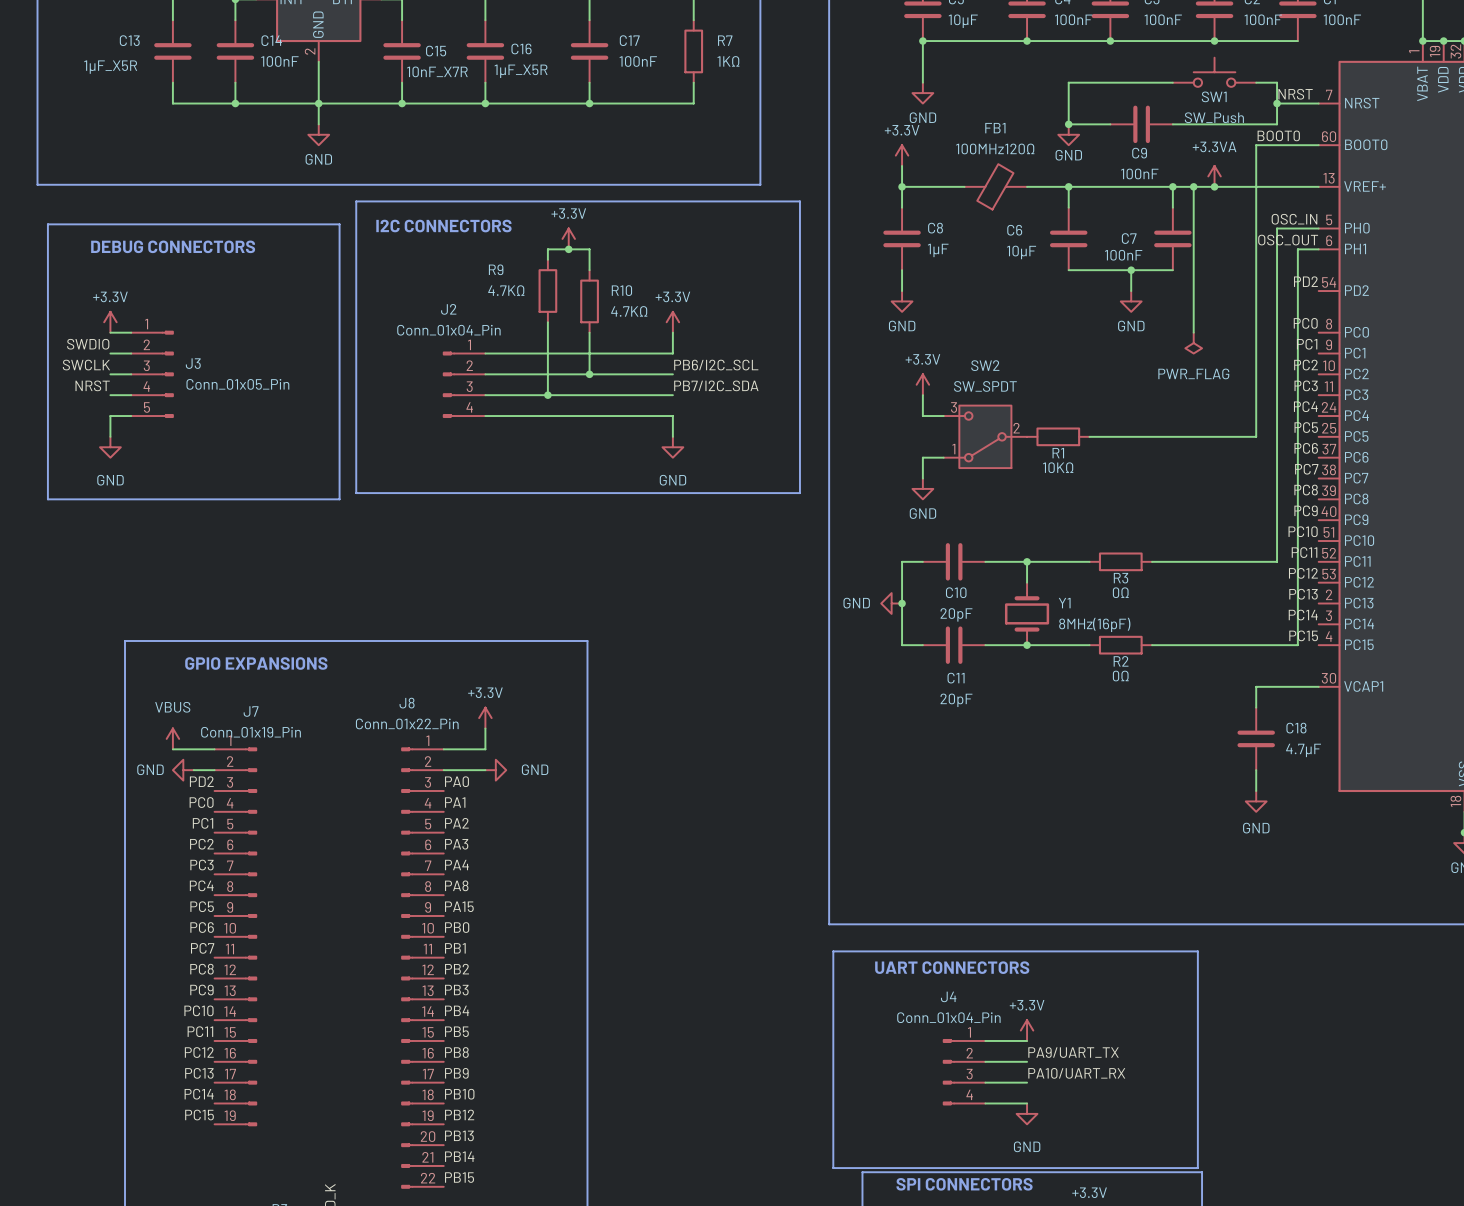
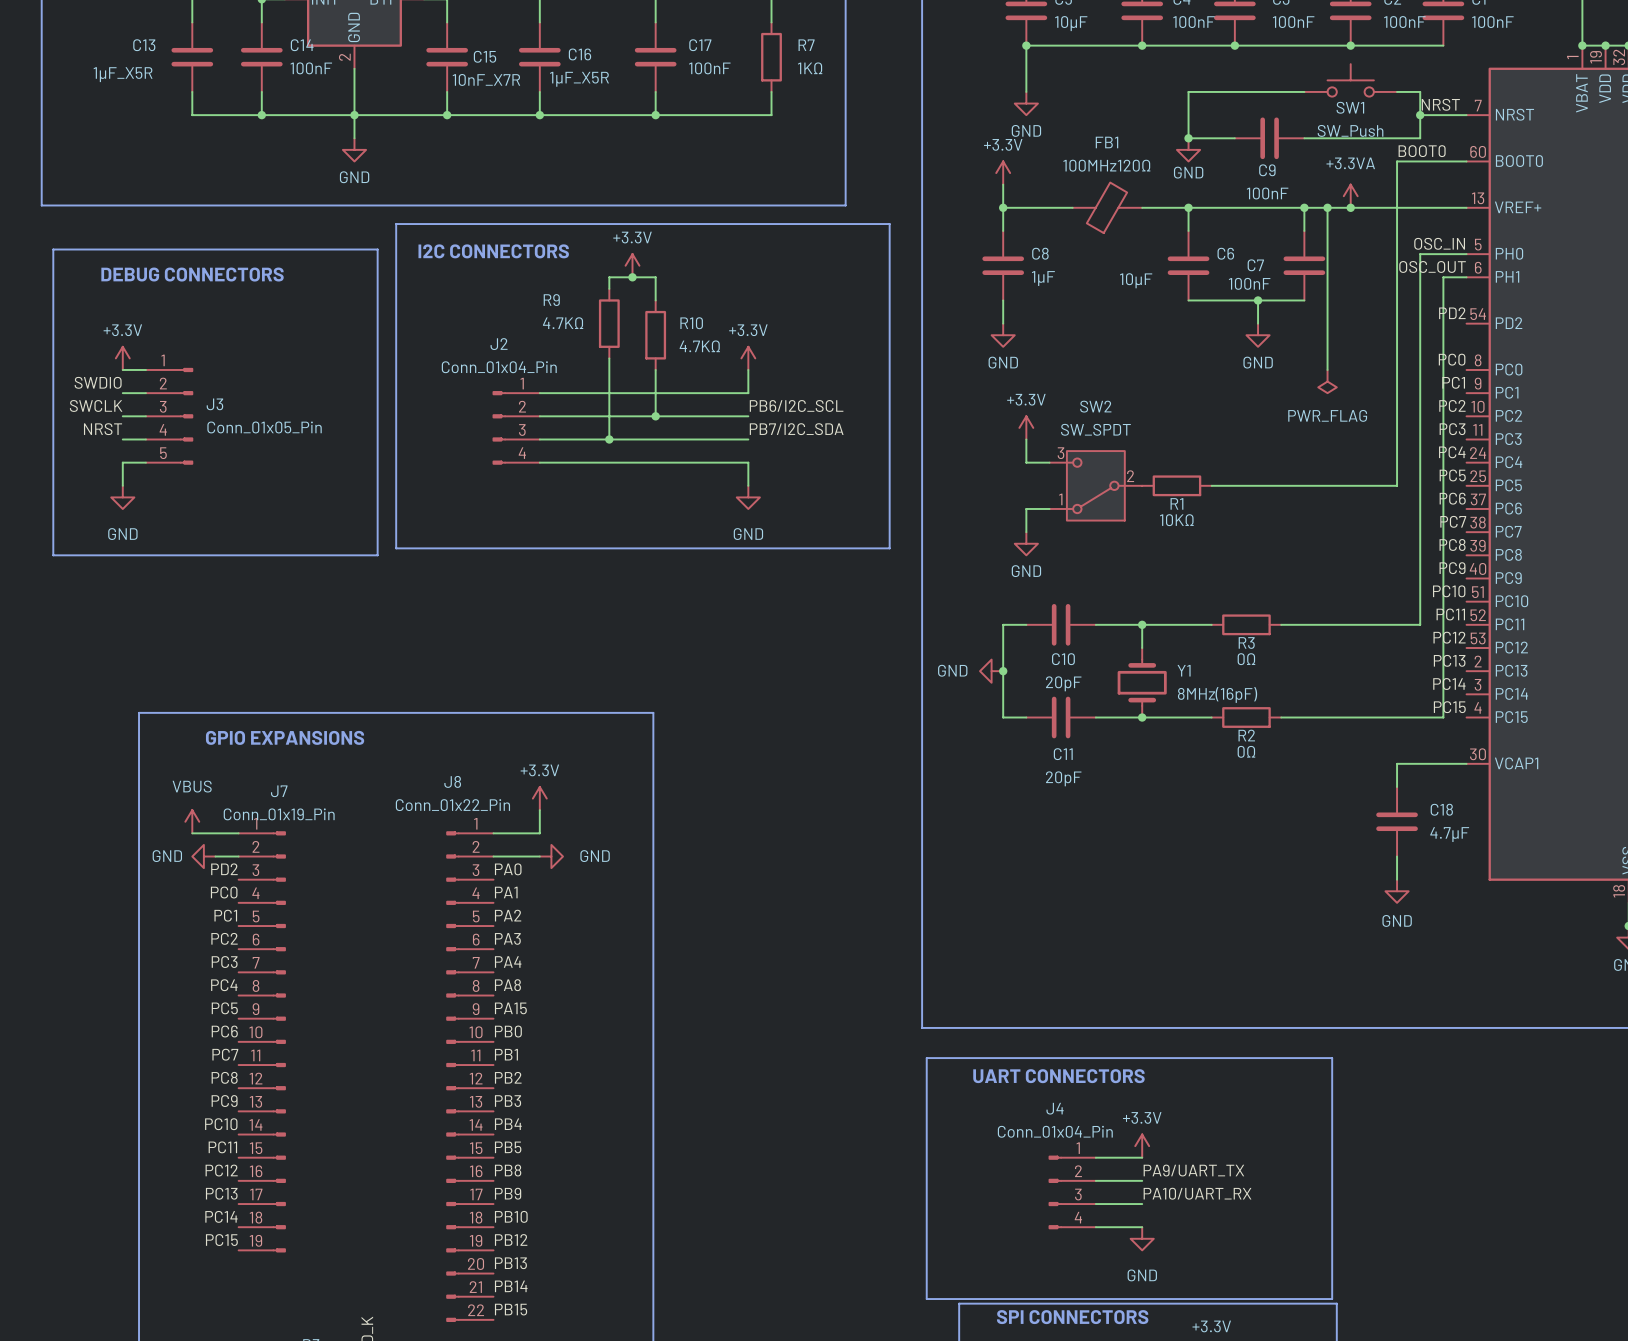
C6 name position: C6 (1014, 230) -> C6 (1225, 253)

